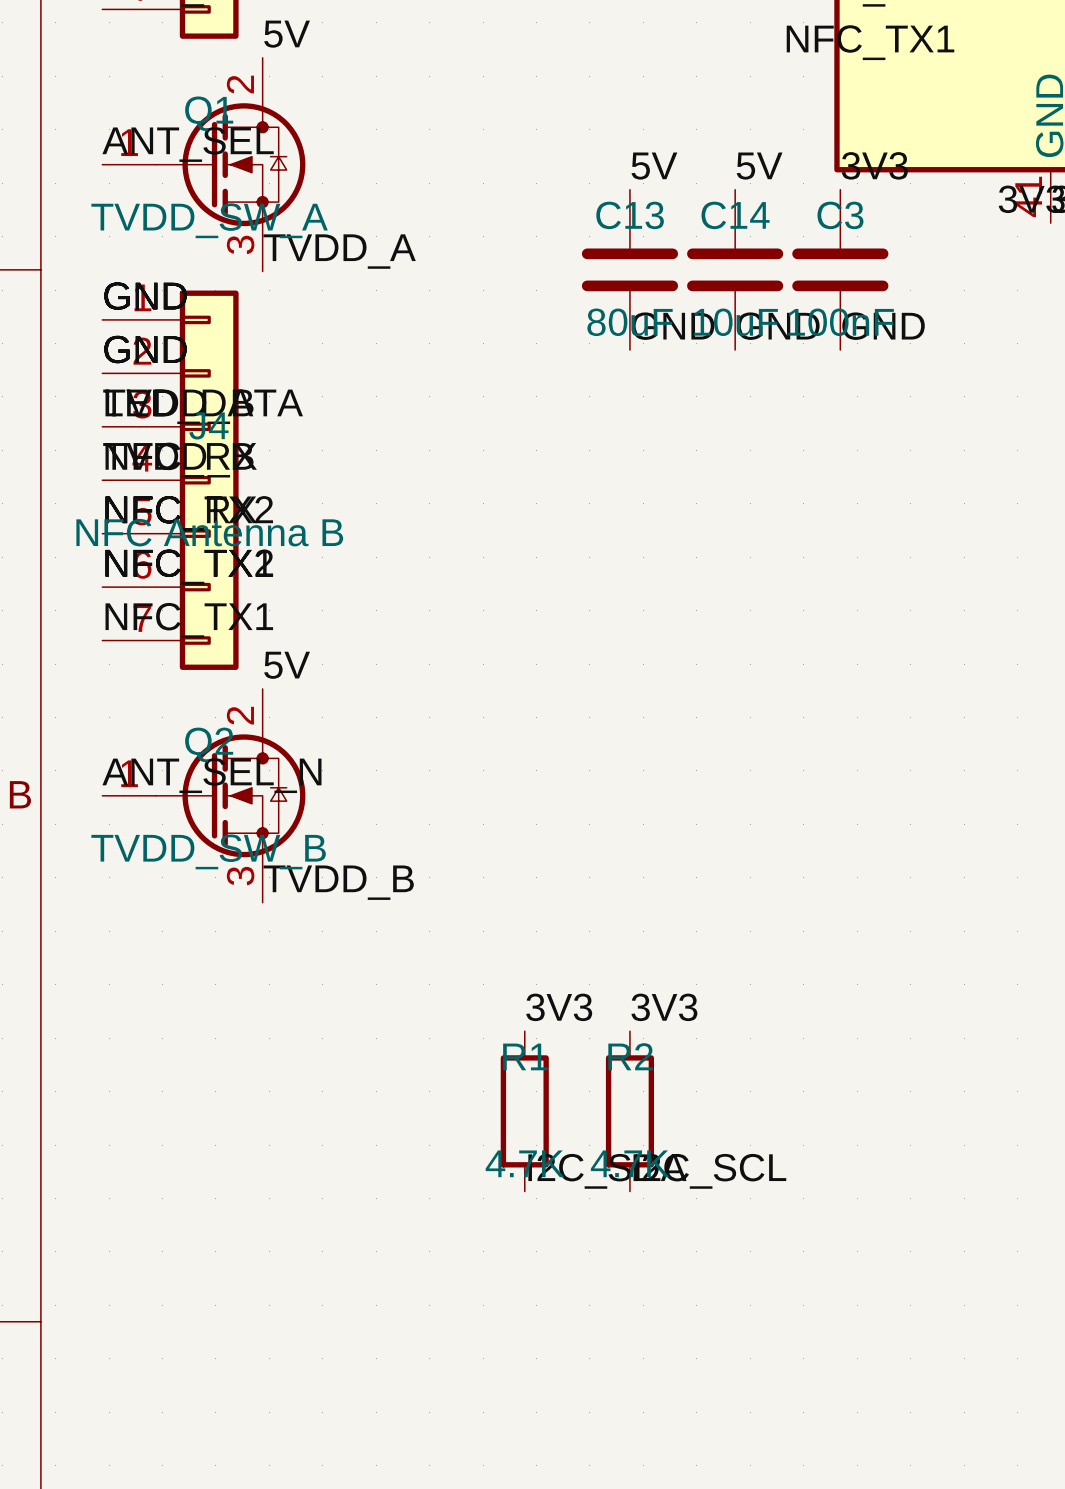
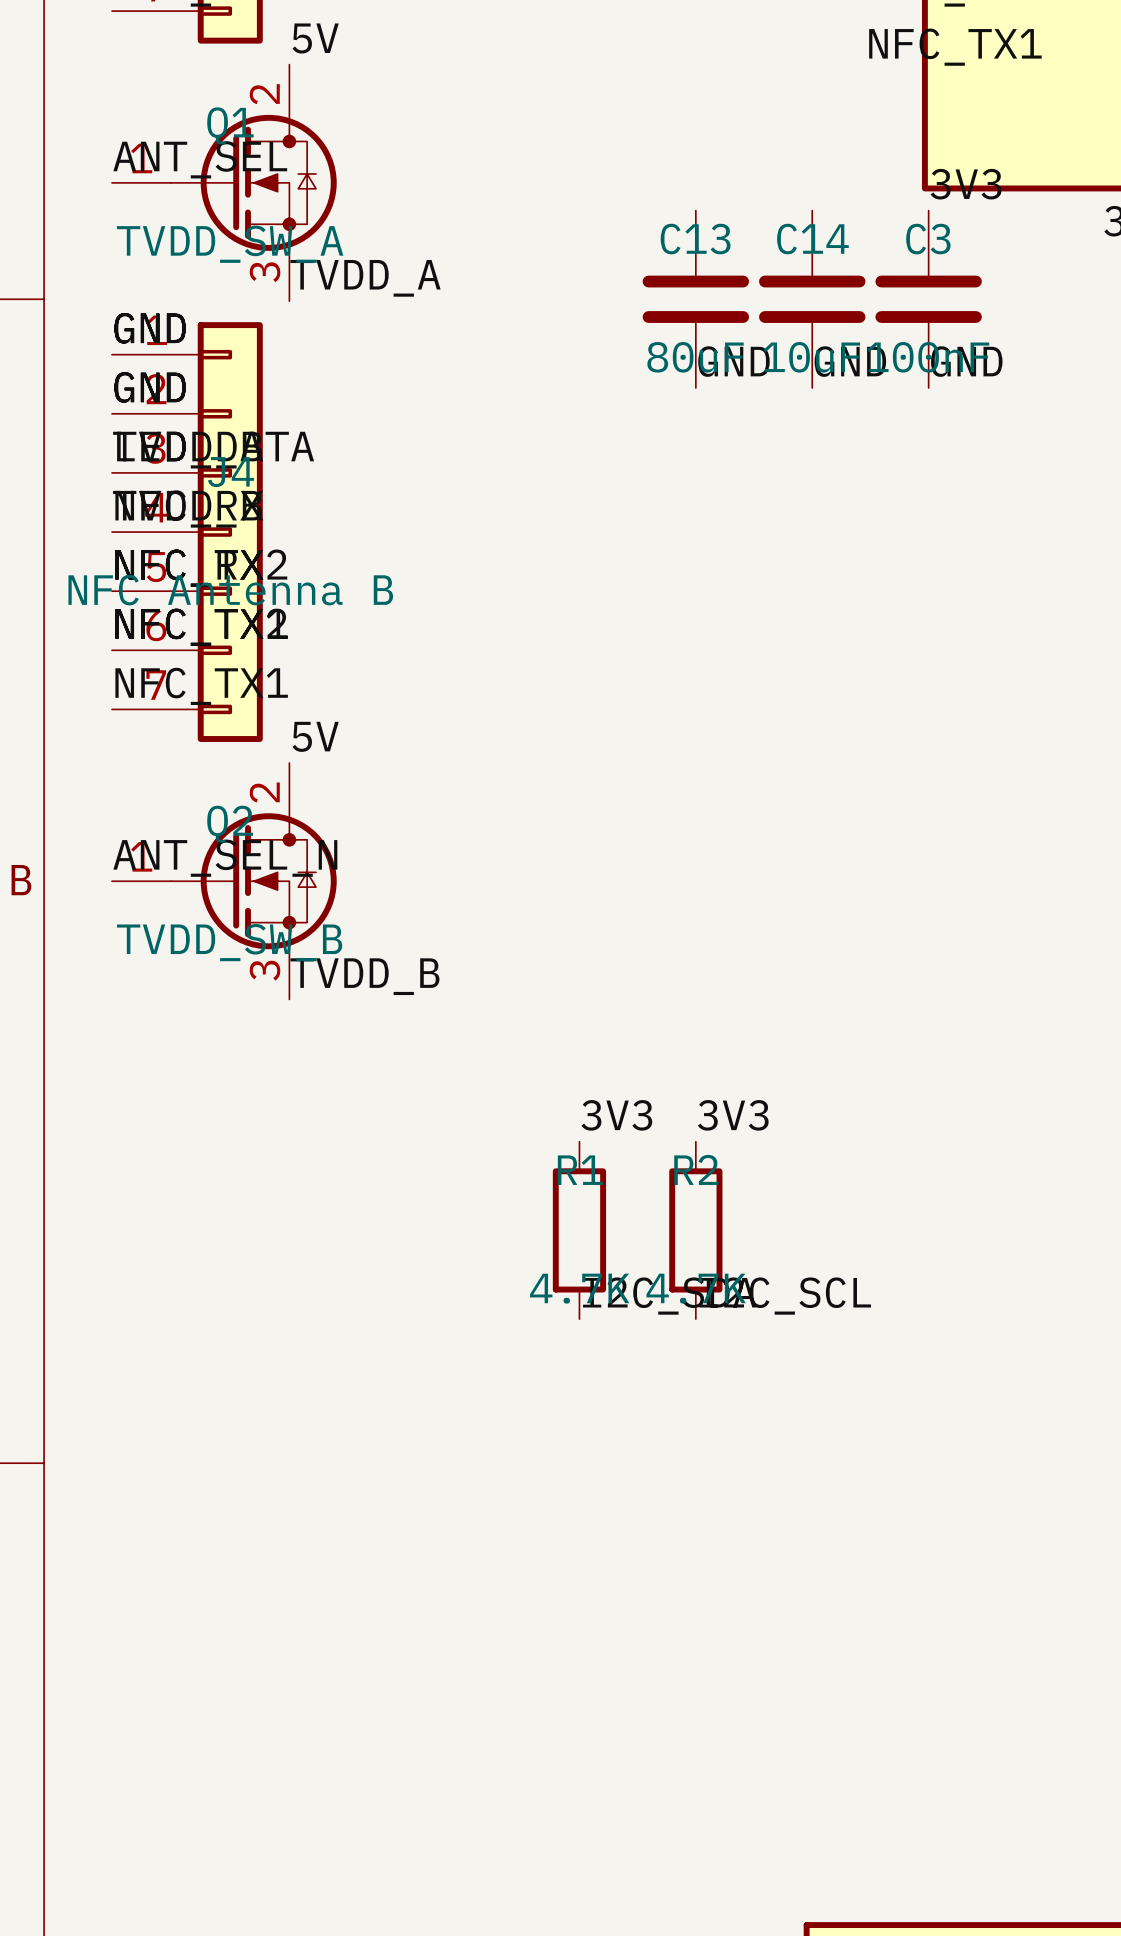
label: 5V (654, 166) -> none
label: 5V (759, 166) -> none

